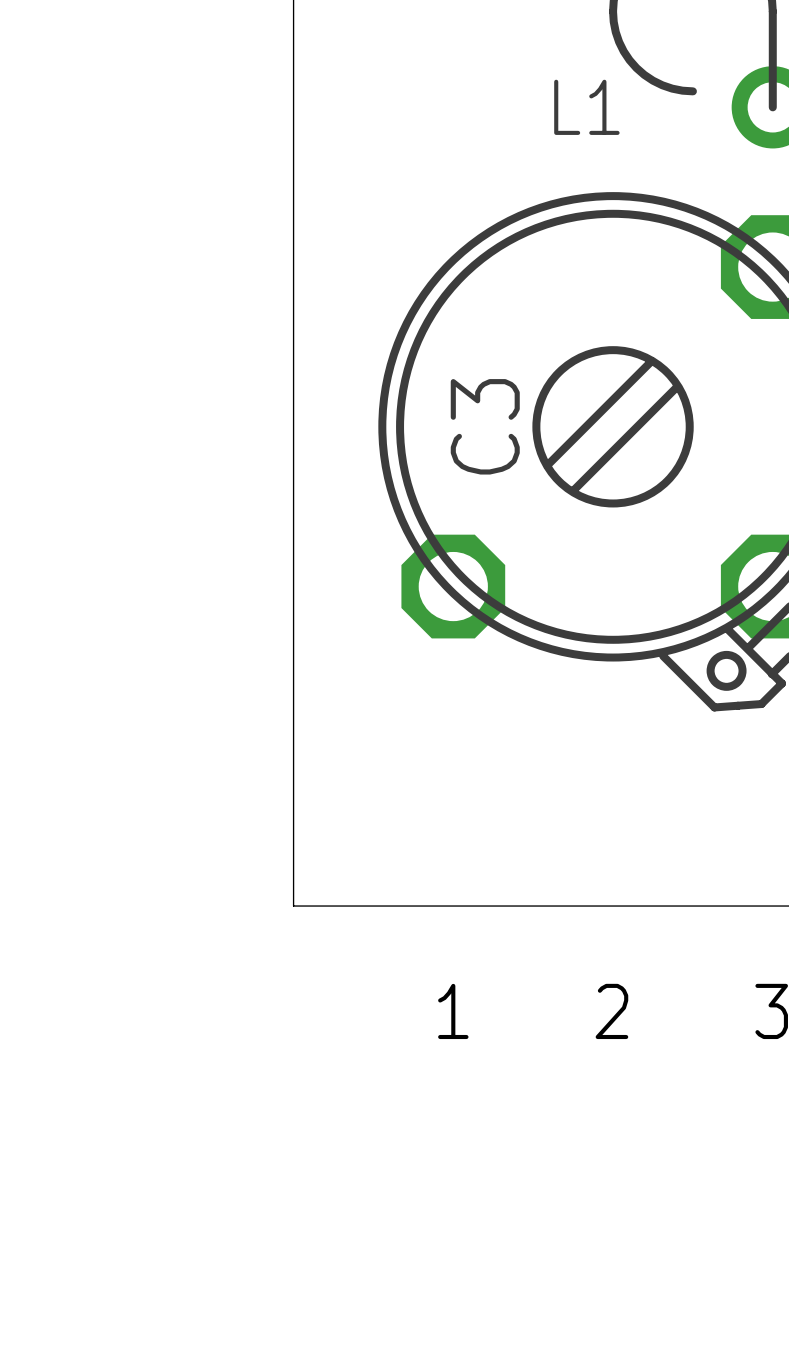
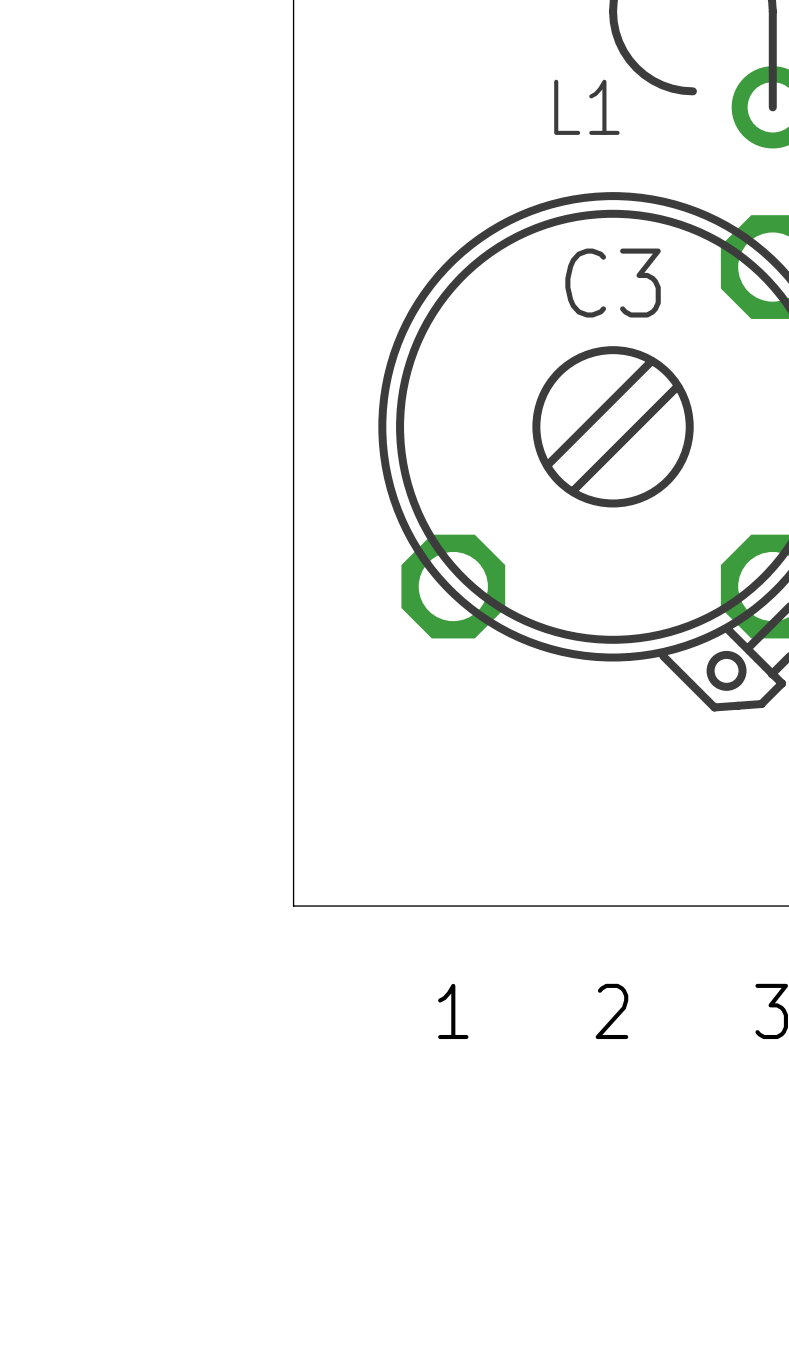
C3 name rotation: 0° (485, 426) -> 90° clockwise (613, 283)
C3 name position: C3 (485, 426) -> C3 (613, 283)

